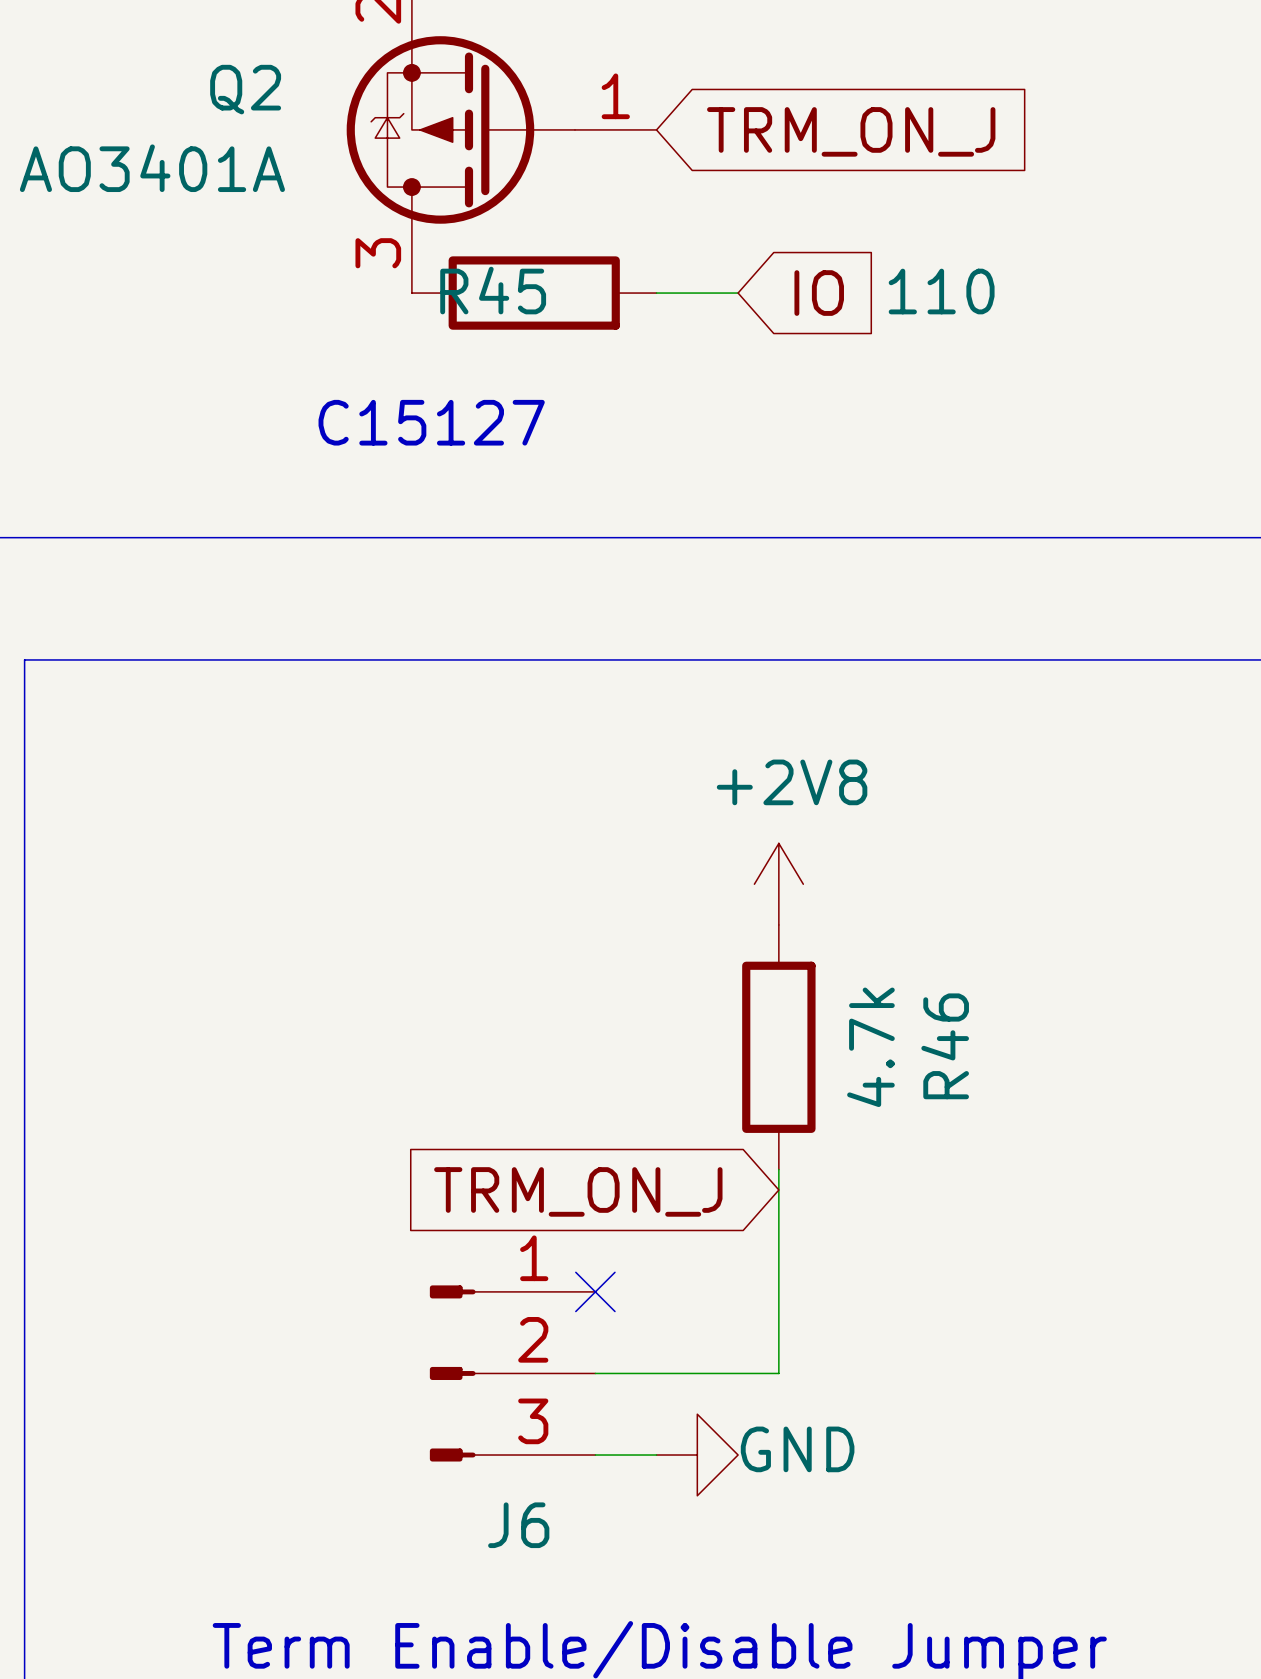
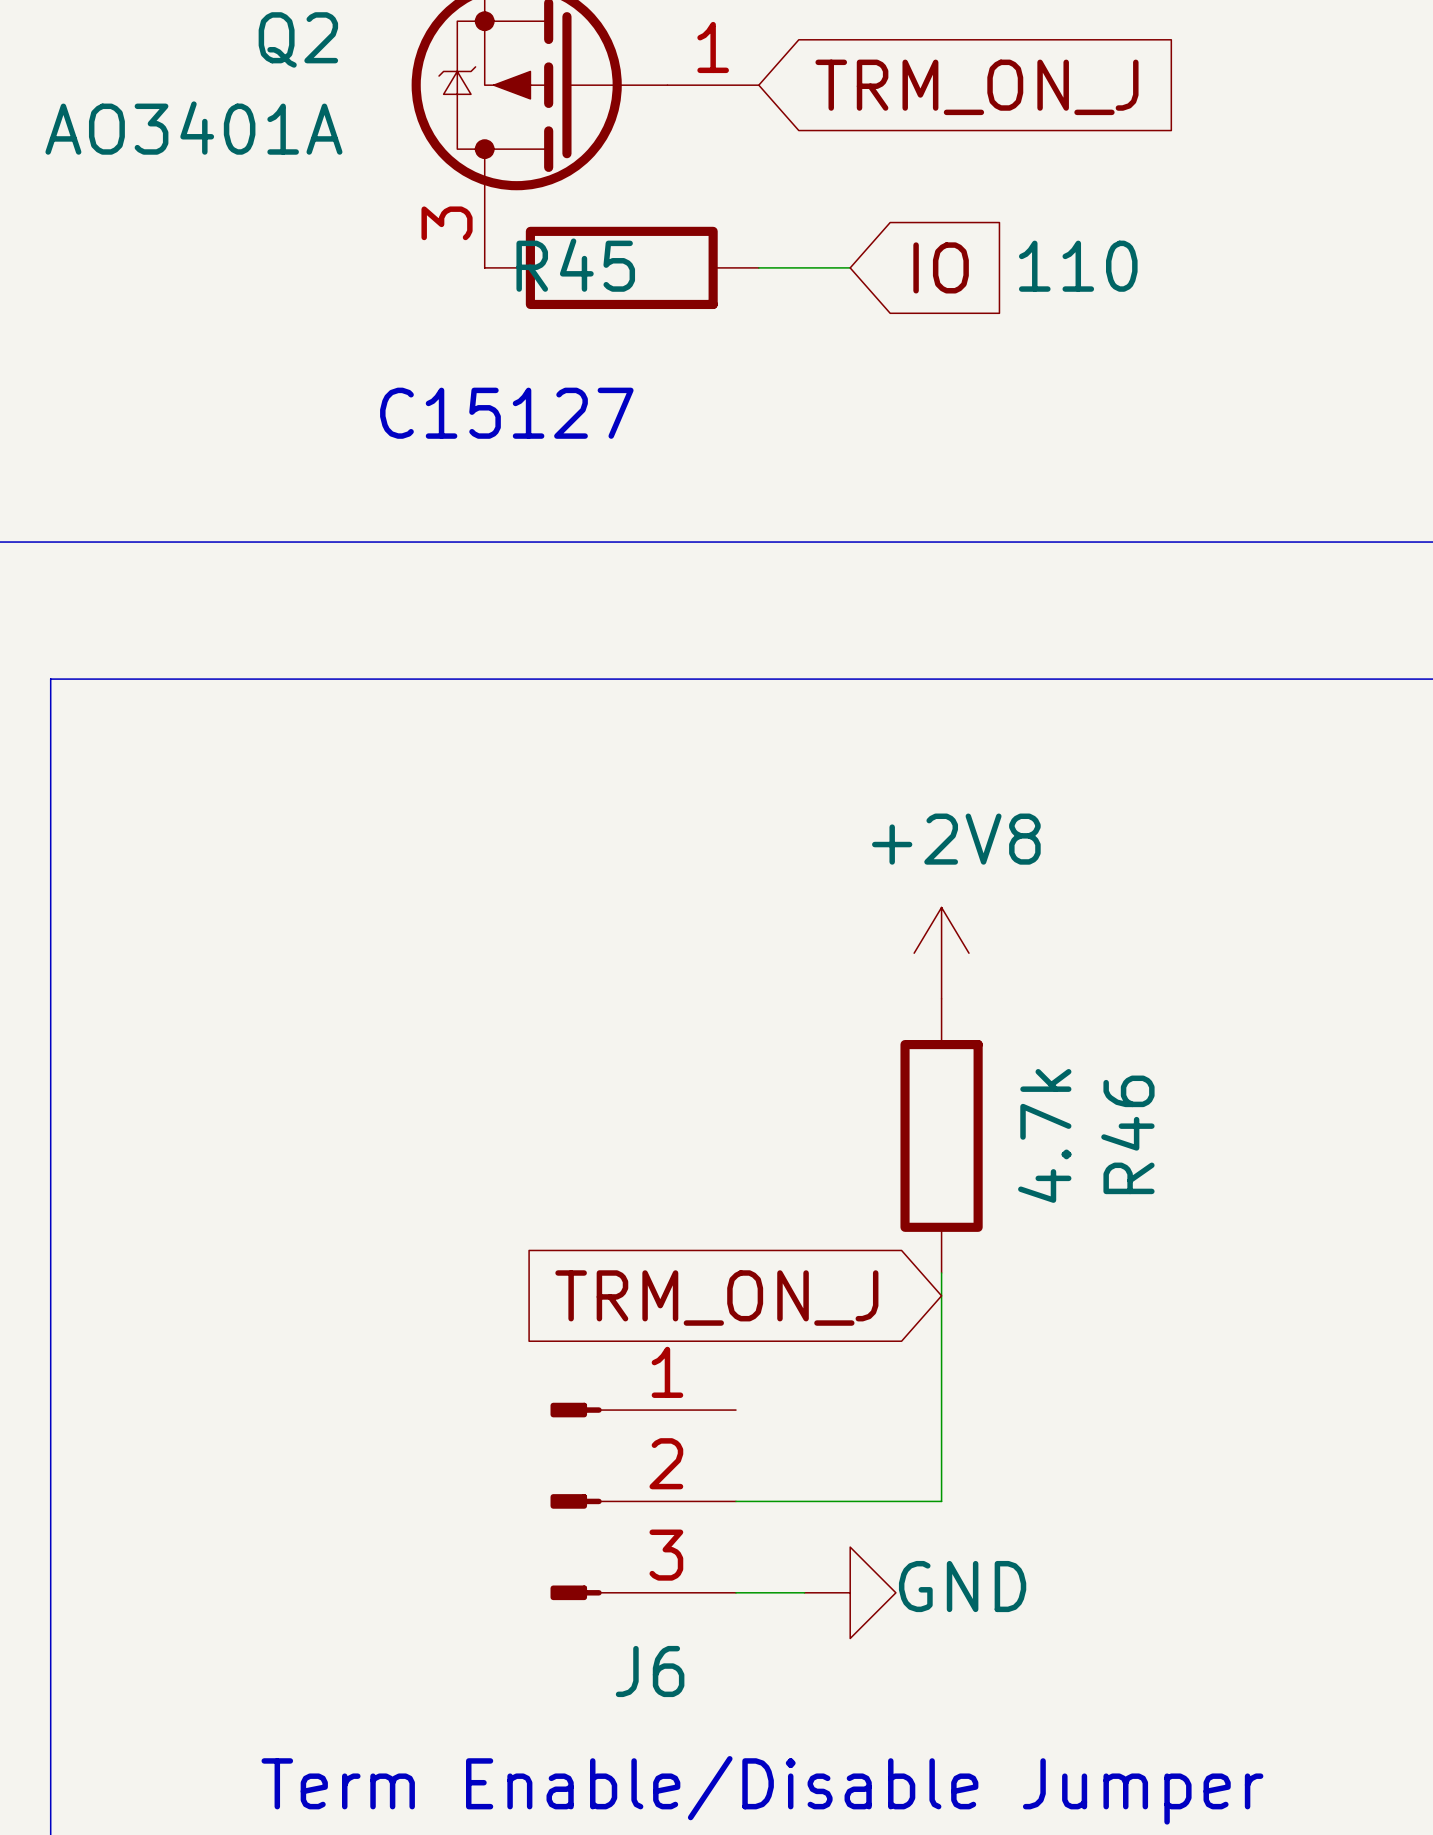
power symbol position: +2V8 (778, 884) -> +2V8 (941, 953)
R46 position: (778, 1047) -> (941, 1135)
wire: (778, 1169) (778, 1373) (595, 1373) -> (941, 1273) (941, 1501) (735, 1501)
global label position: TRM_ON_J (578, 1191) -> TRM_ON_J (716, 1298)
no-connect mark: (595, 1291) -> none
J6 position: (512, 1373) -> (643, 1501)
wire: (595, 1455) (656, 1455) -> (735, 1592) (804, 1592)
power symbol position: GND (697, 1455) -> GND (850, 1592)

